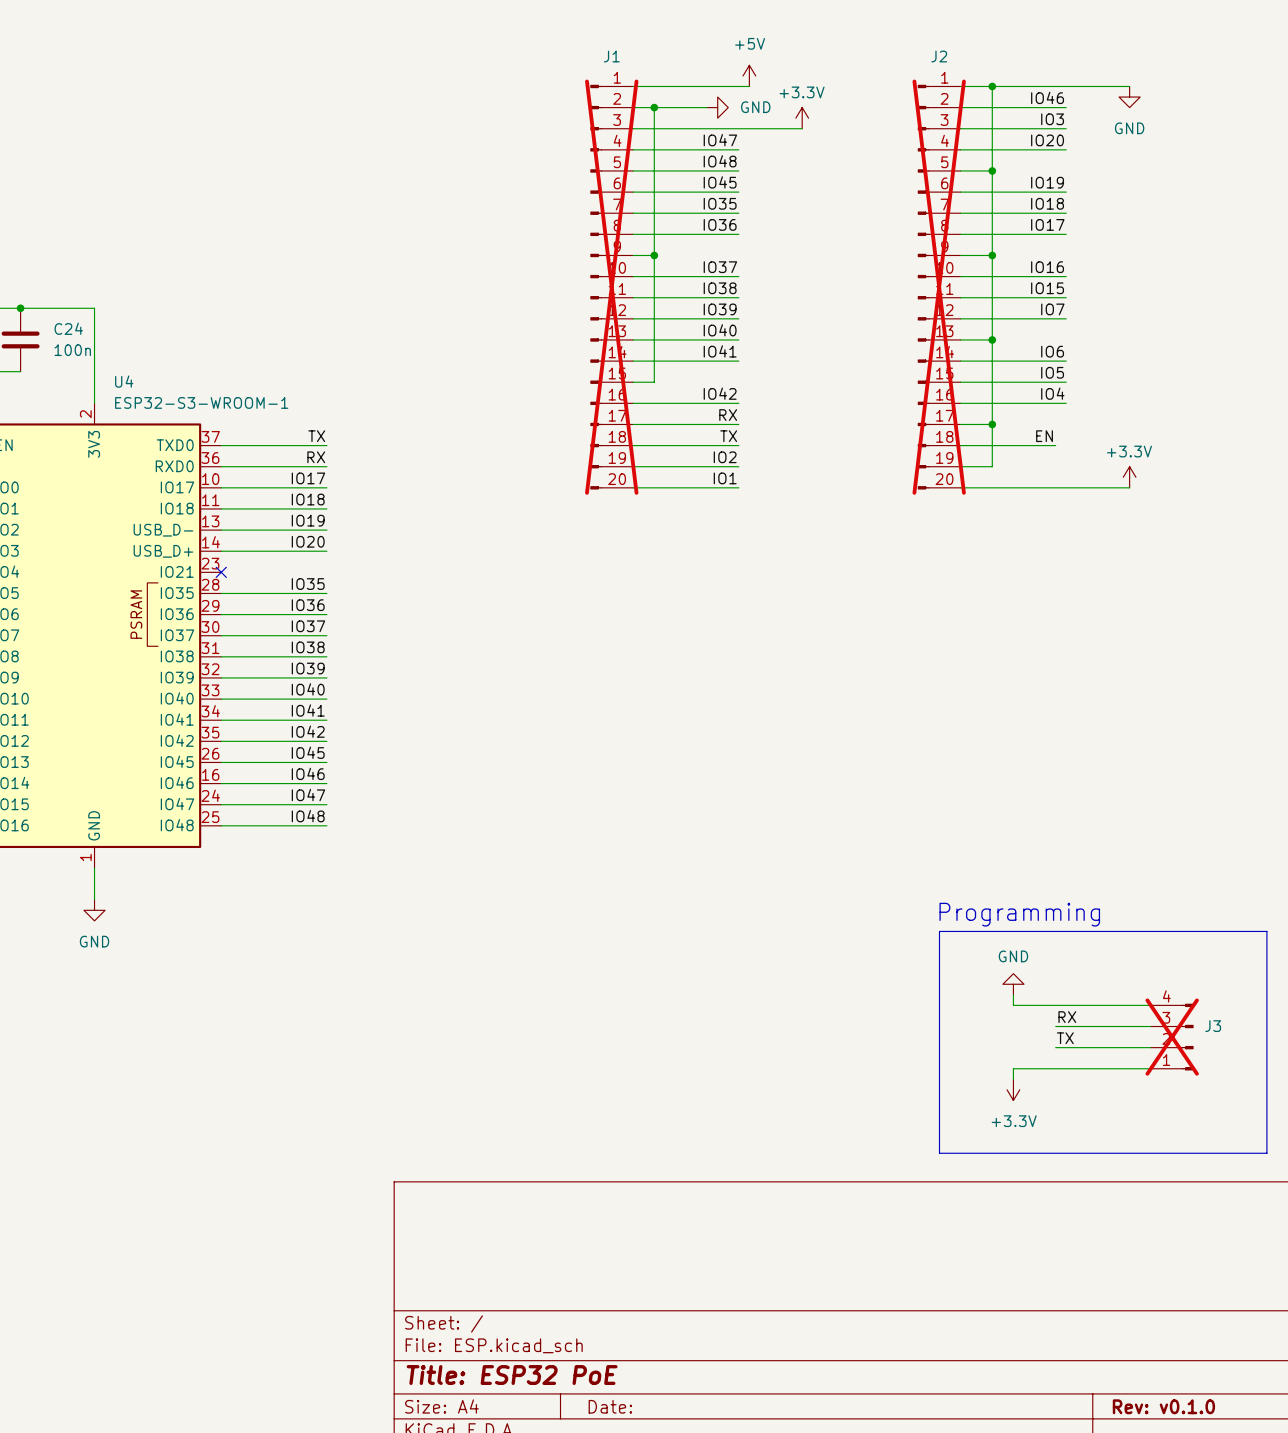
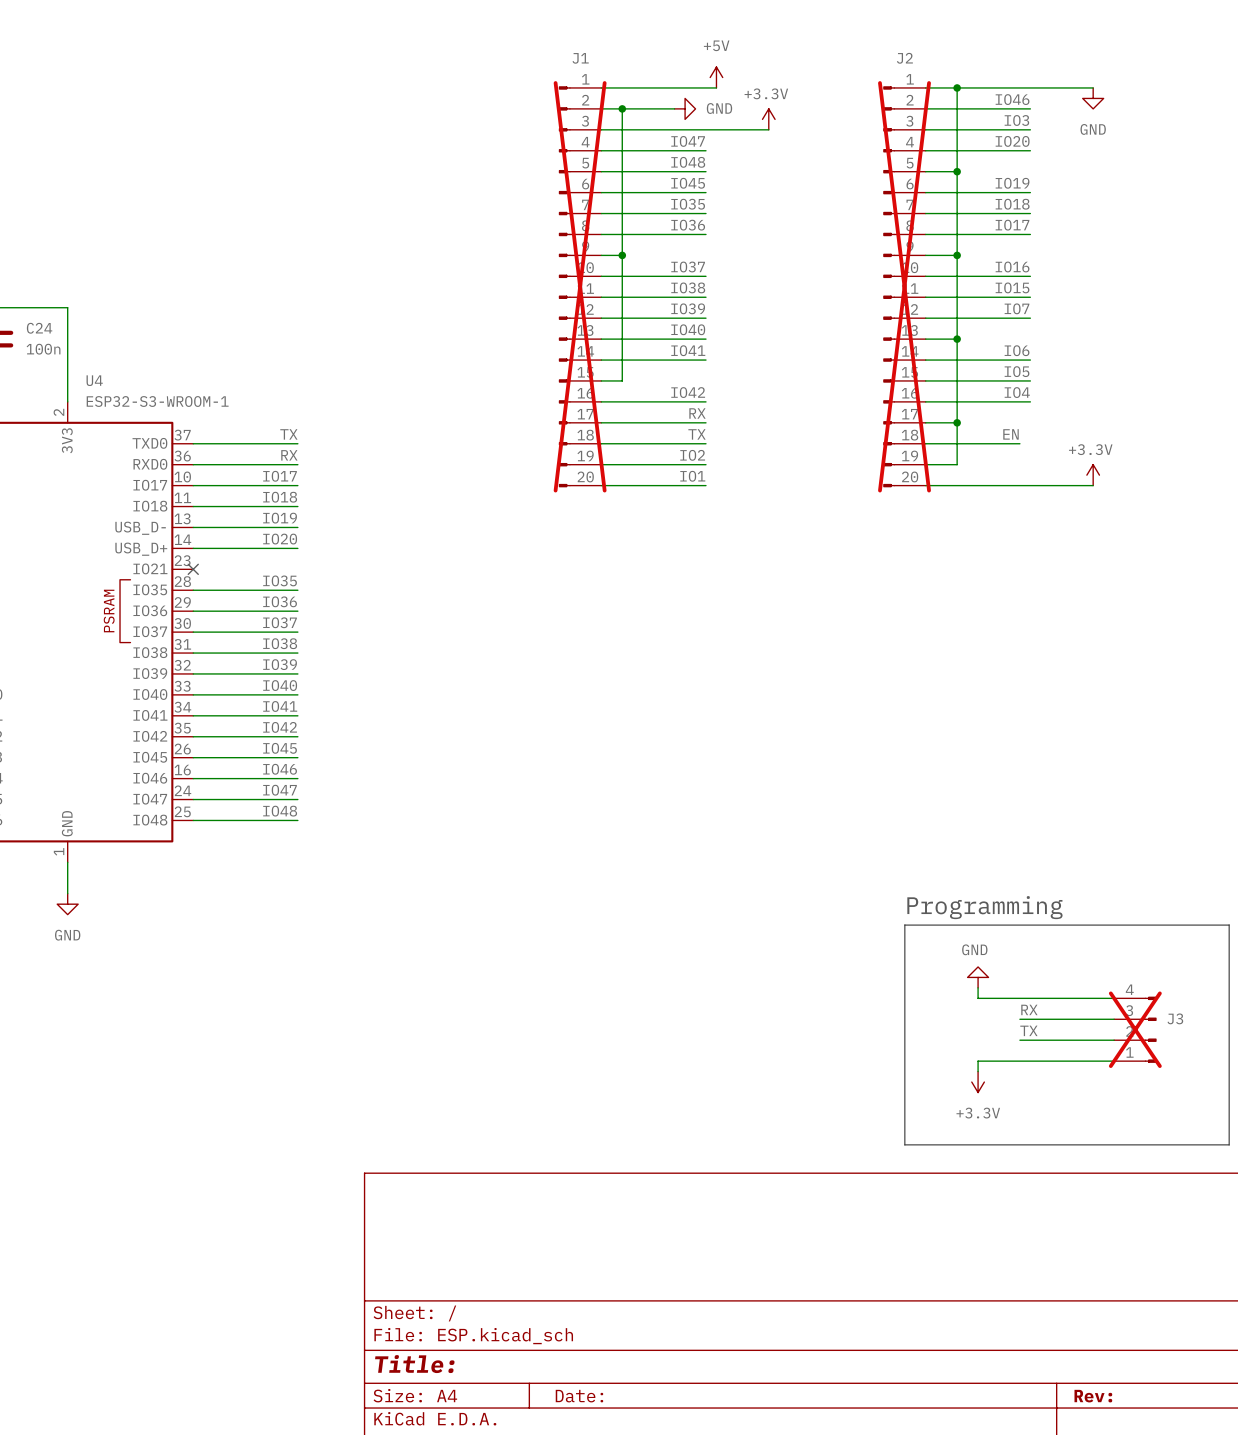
title block: Title: ESP32 PoE (512, 1375) -> Title: (414, 1364)
title block: Rev: v0.1.0 (1163, 1406) -> Rev: (1093, 1396)

